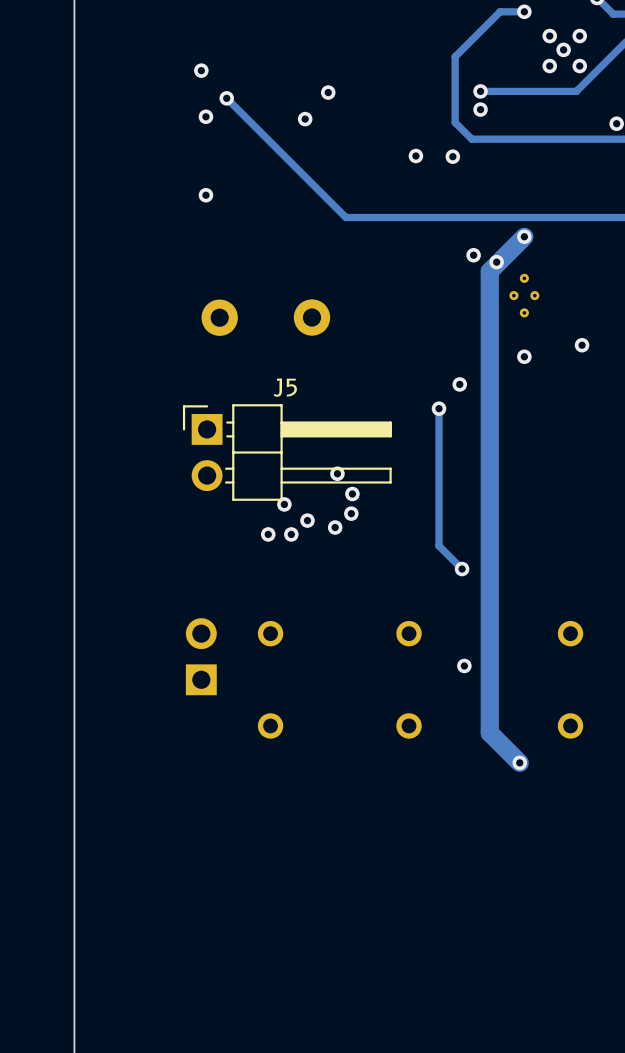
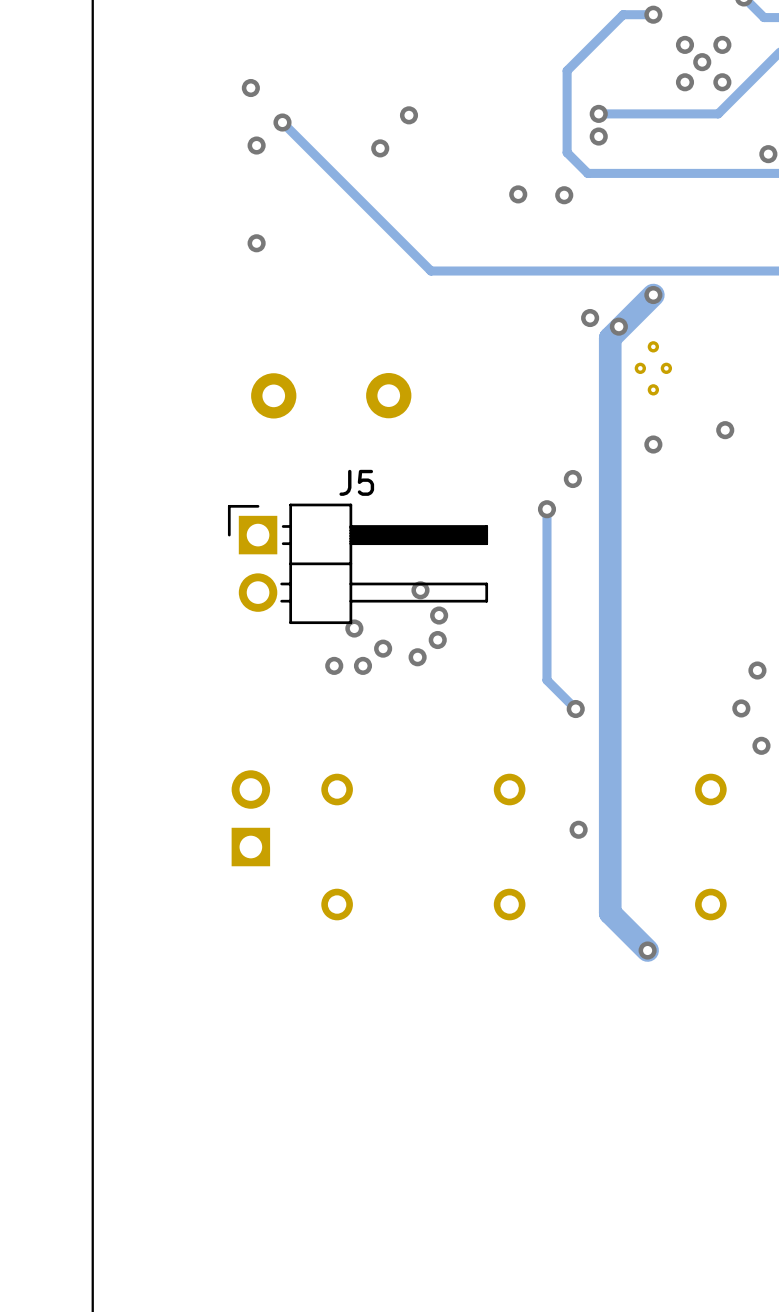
via: none -> (757, 670)
via: none -> (741, 708)
via: none -> (761, 745)

